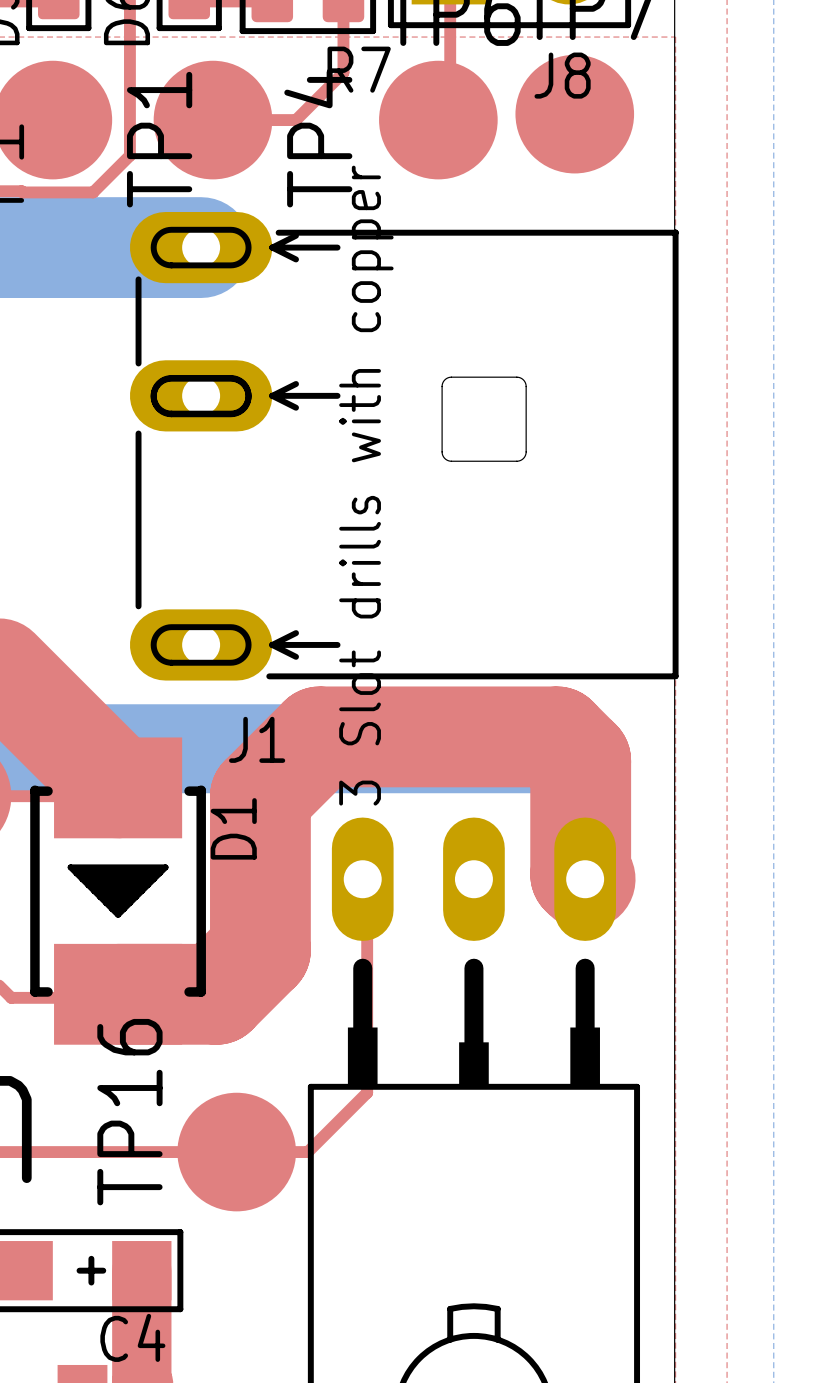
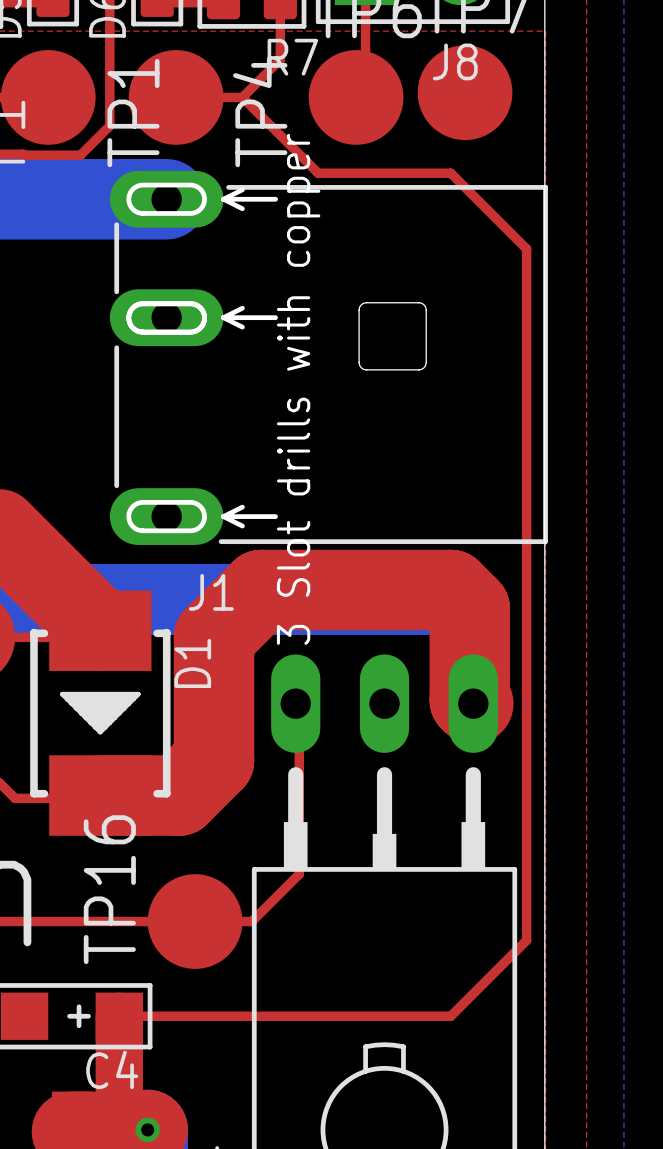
top track: none -> (242, 97) (318, 173) (450, 173) (526, 248) (526, 940) (450, 1016) (119, 1016)

